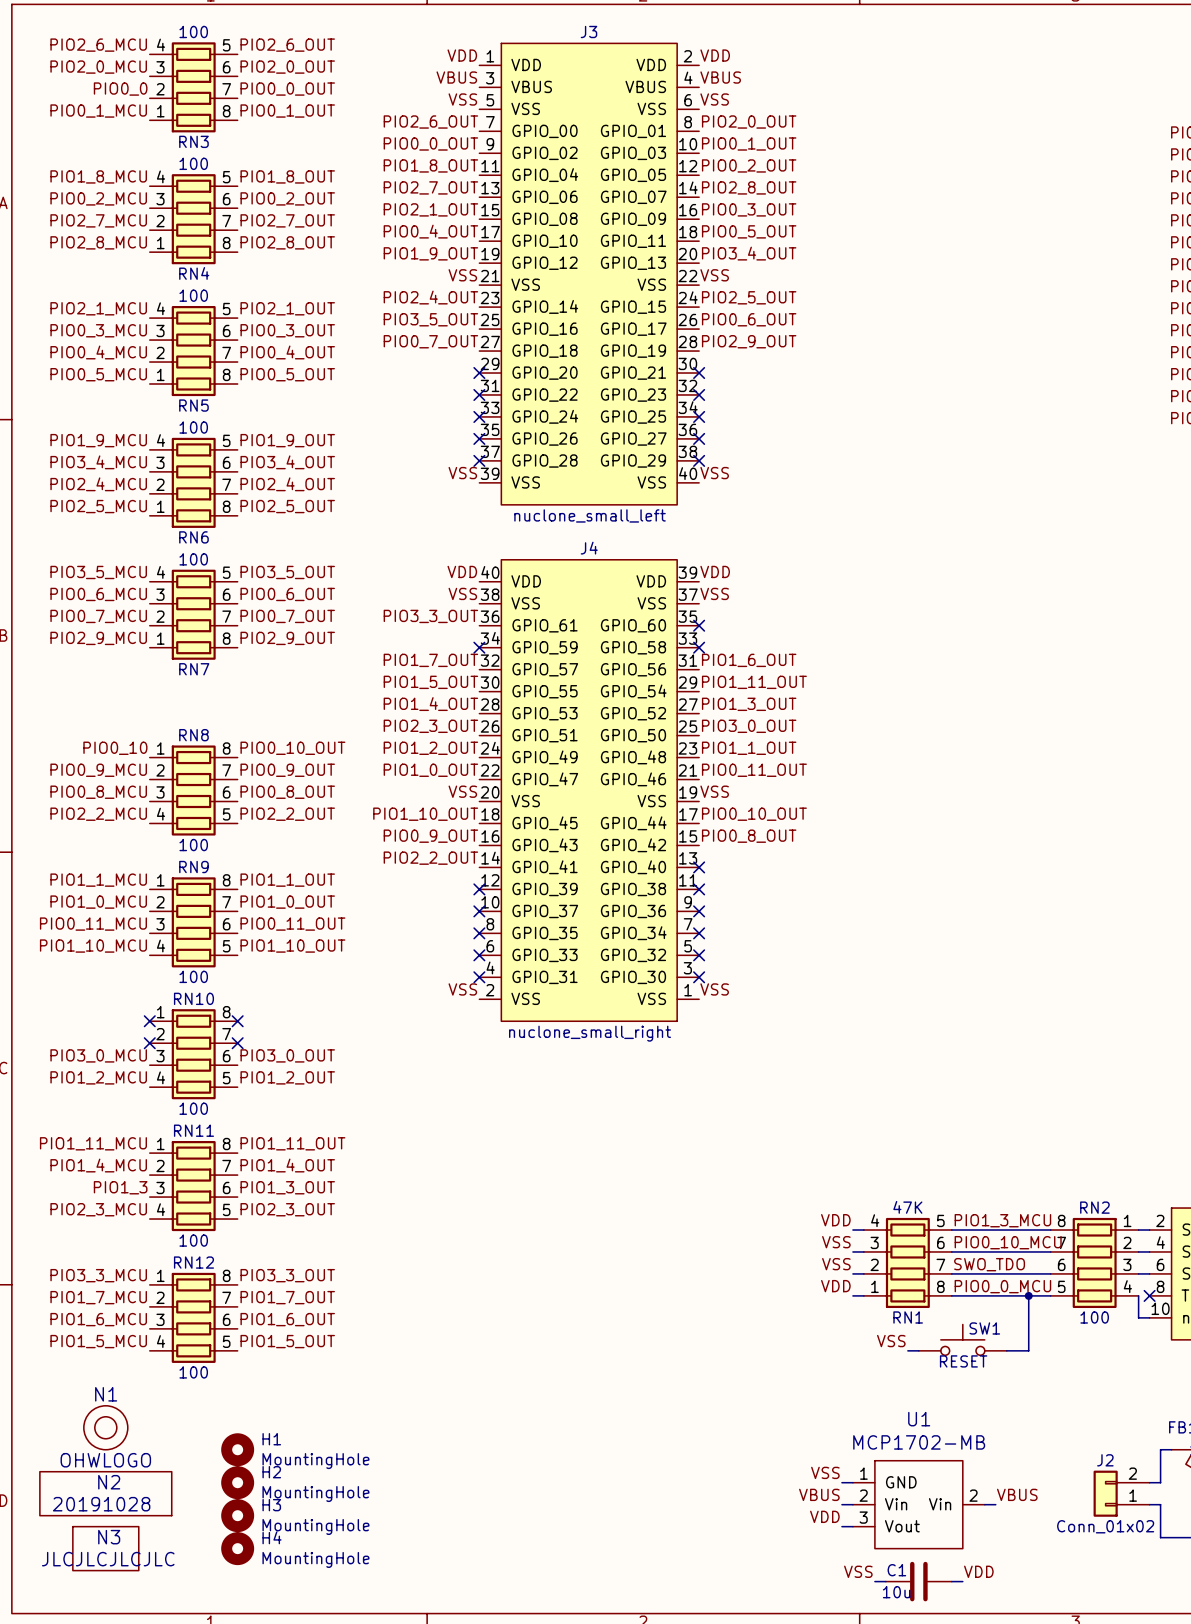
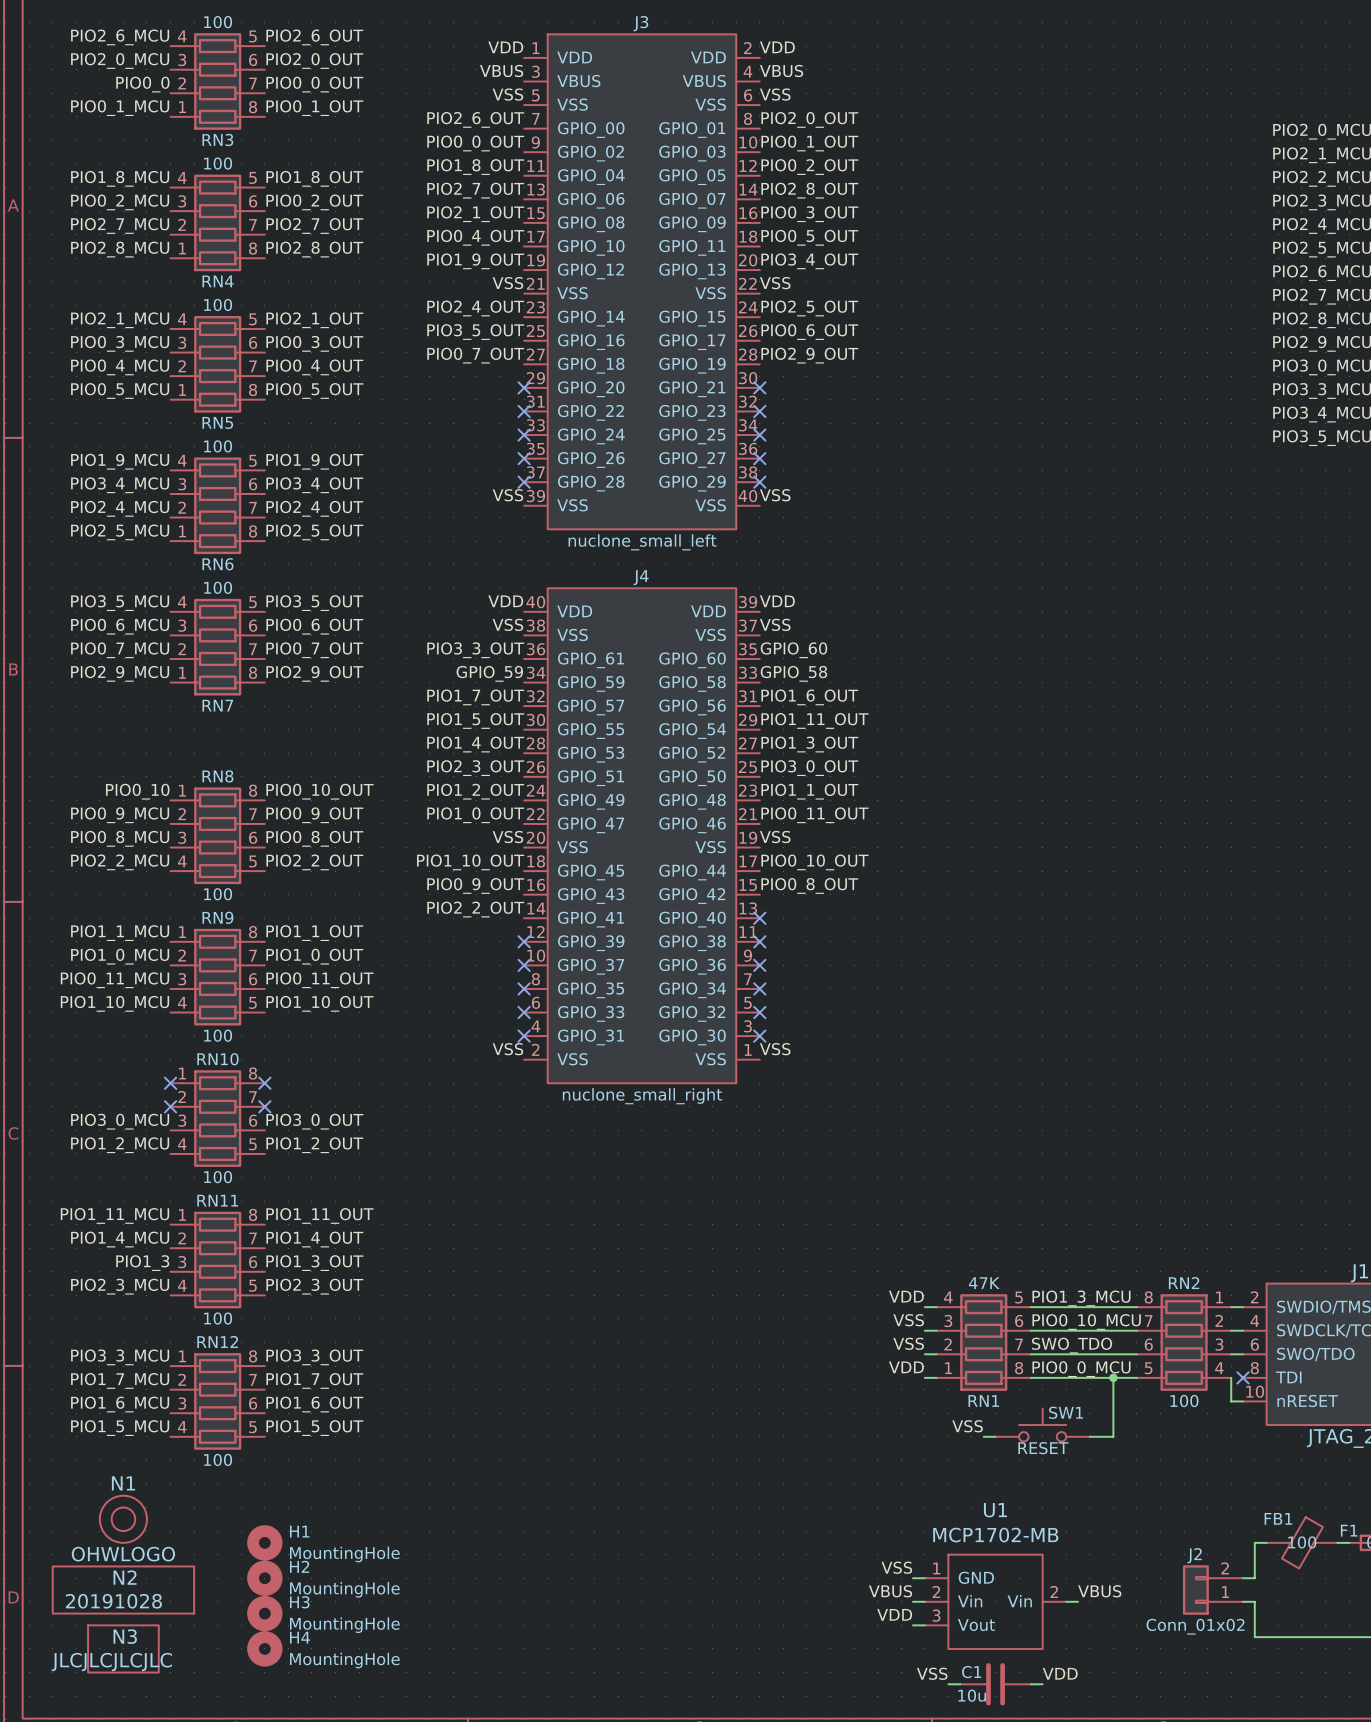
label: none -> GPIO_60 (793, 650)
no-connect mark: (699, 625) -> none
label: none -> GPIO_59 (489, 673)
label: none -> GPIO_58 (793, 673)
no-connect mark: (479, 647) -> none
no-connect mark: (699, 647) -> none

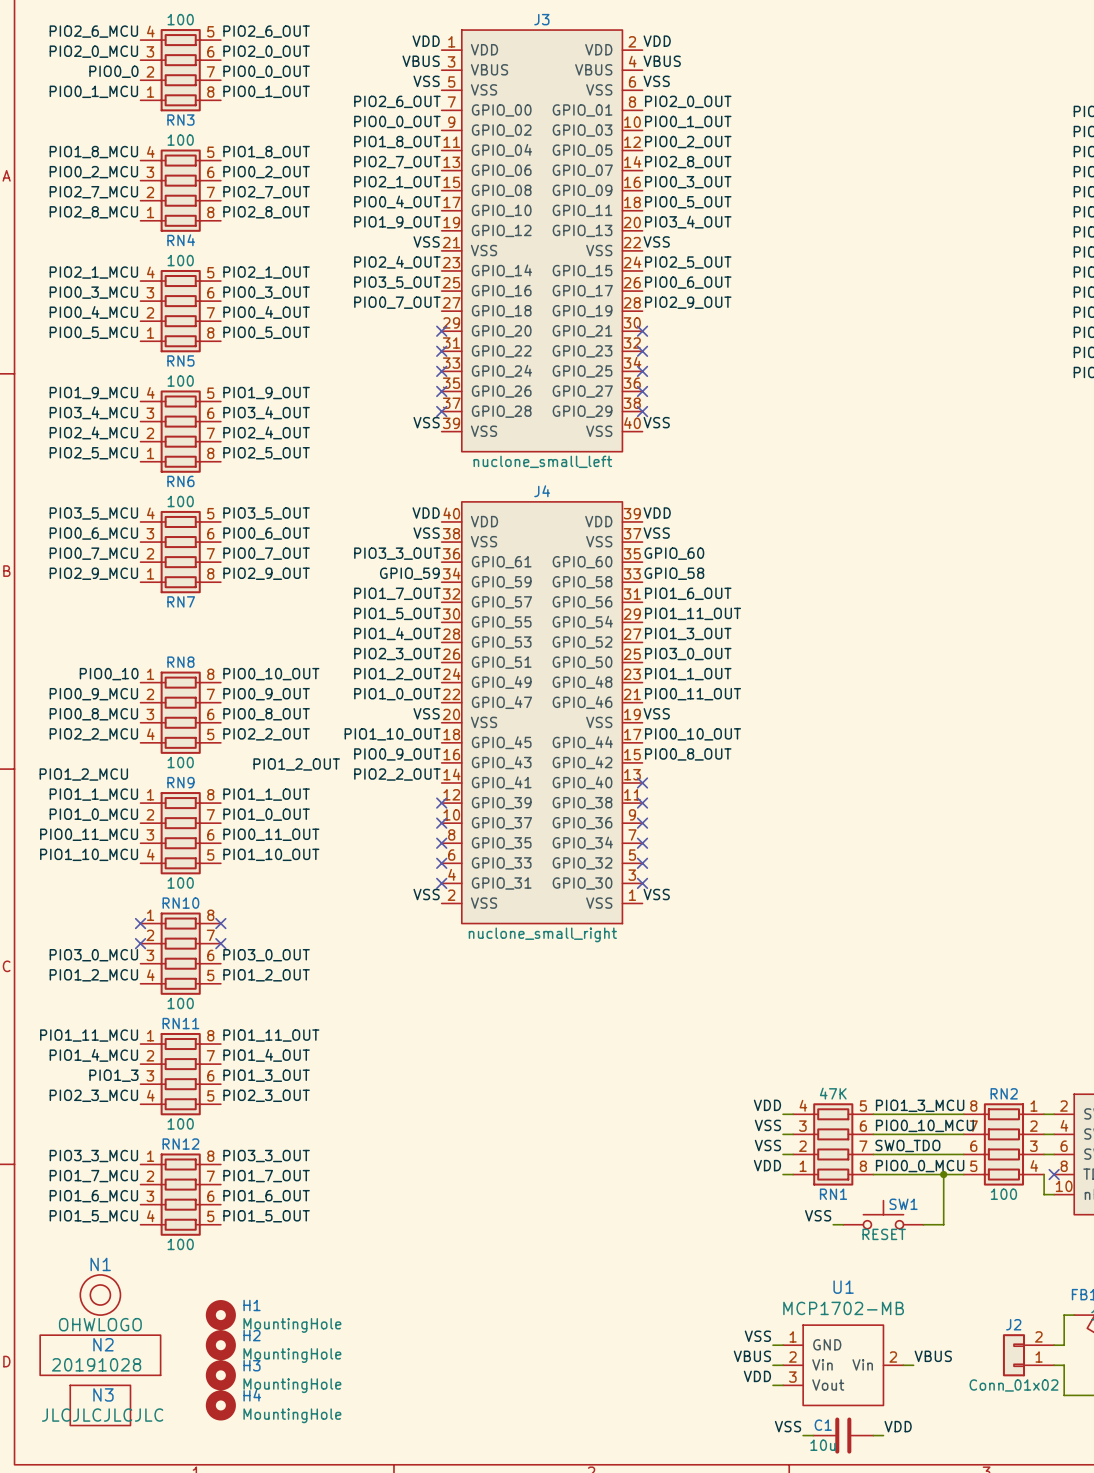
label: none -> PIO1_2_OUT (296, 764)
label: none -> PIO1_2_MCU (83, 774)

